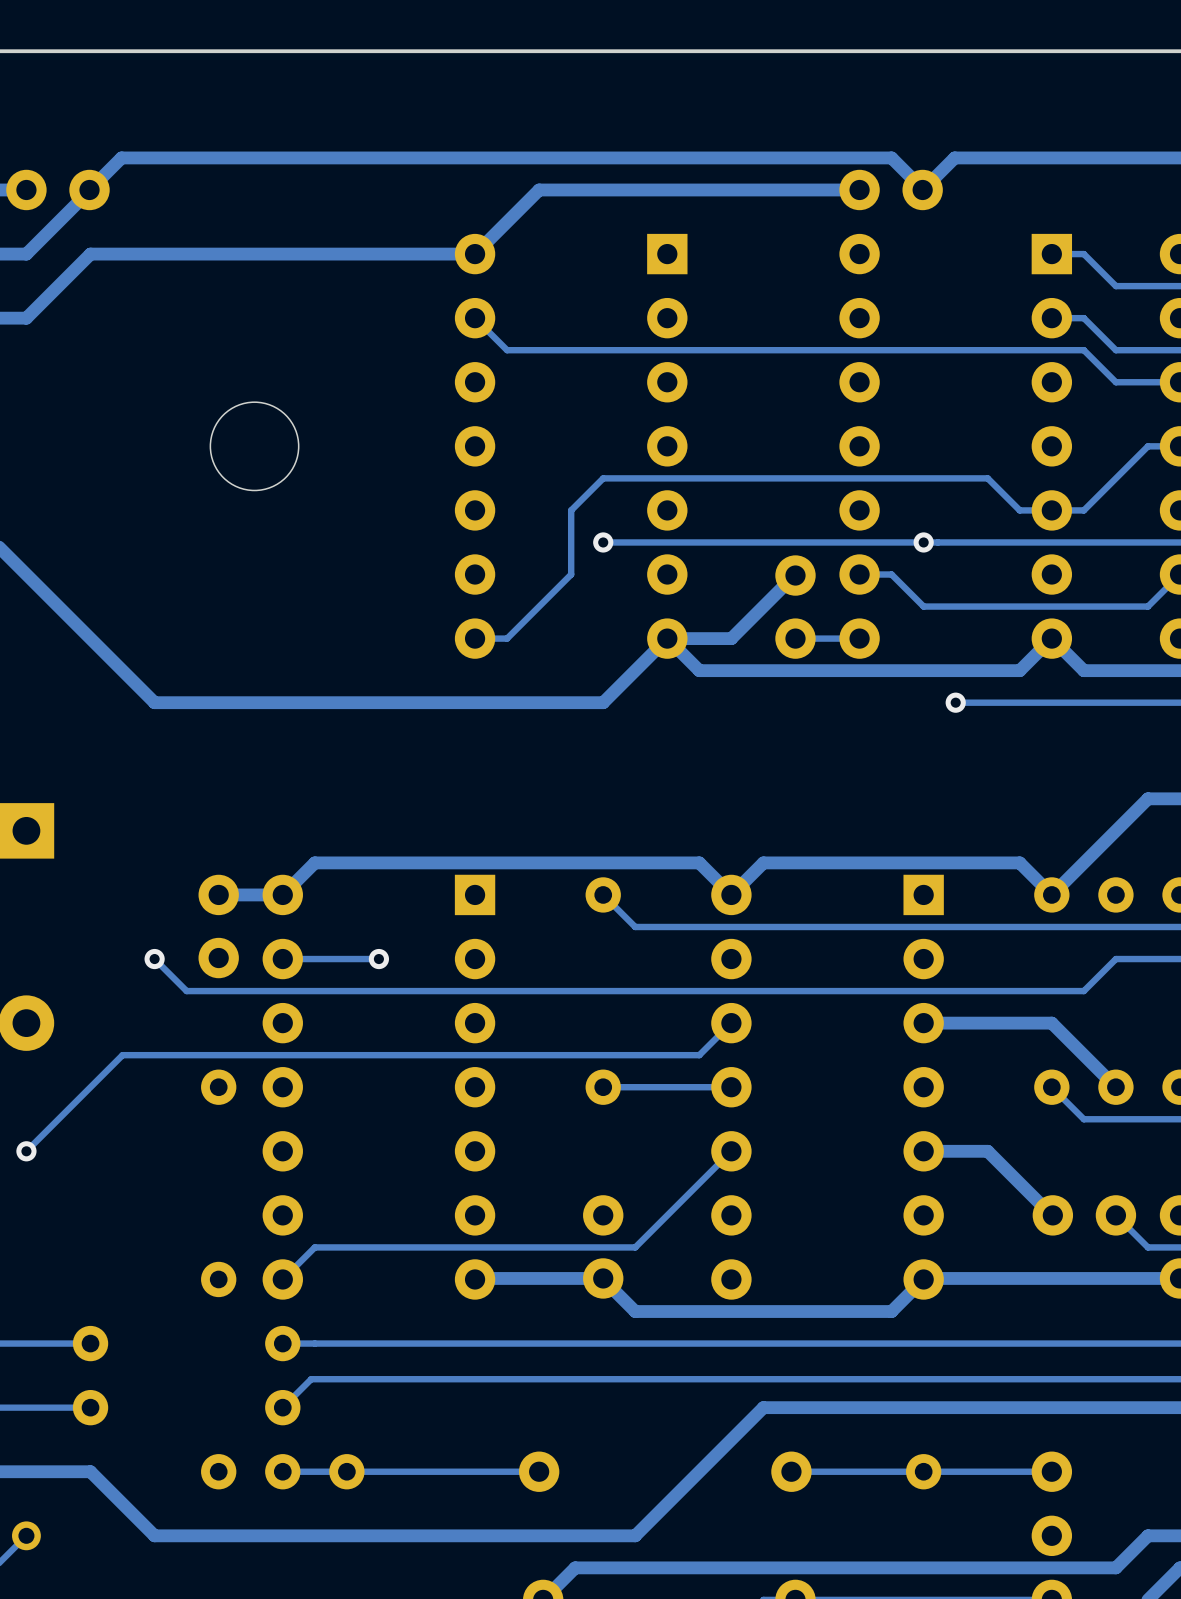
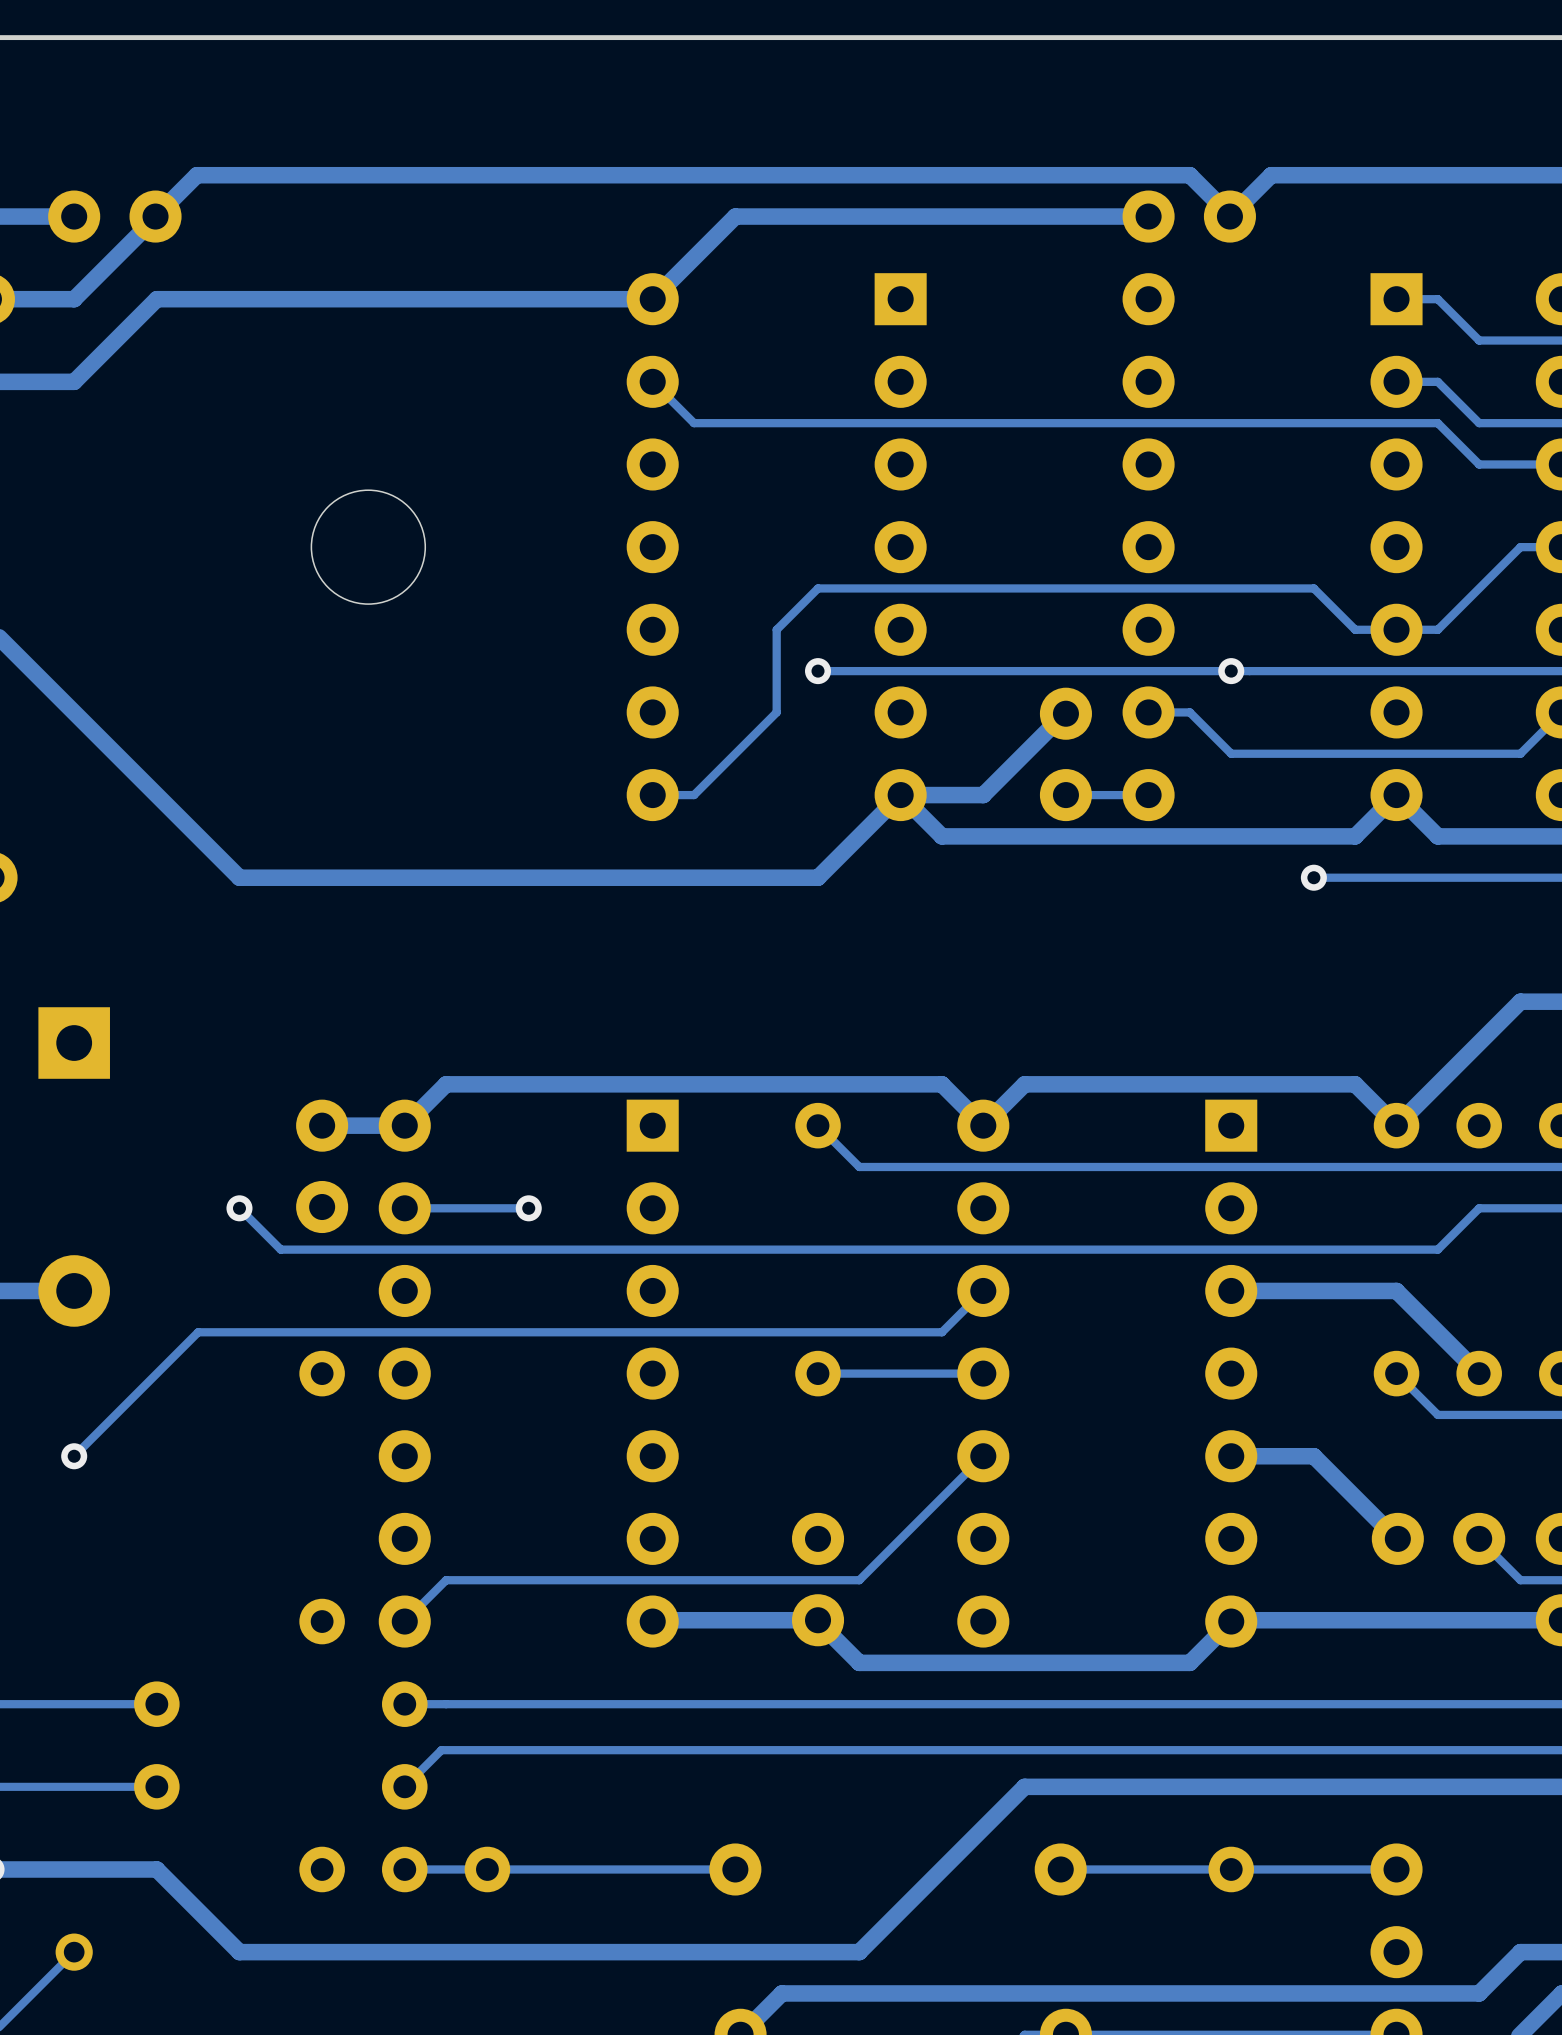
via position: (955, 702) -> (1313, 877)
track: (987, 702) (955, 702) -> none

